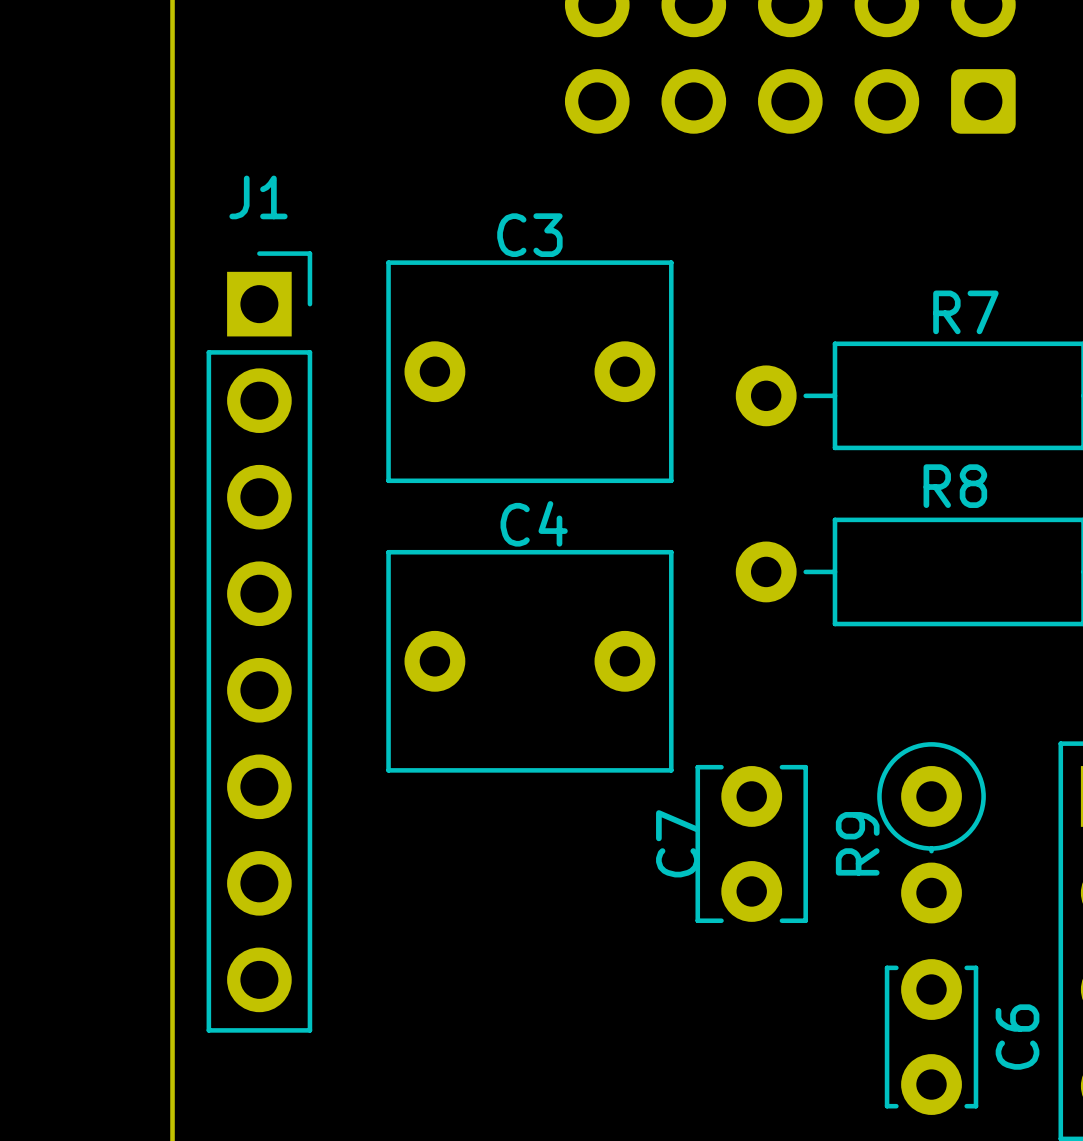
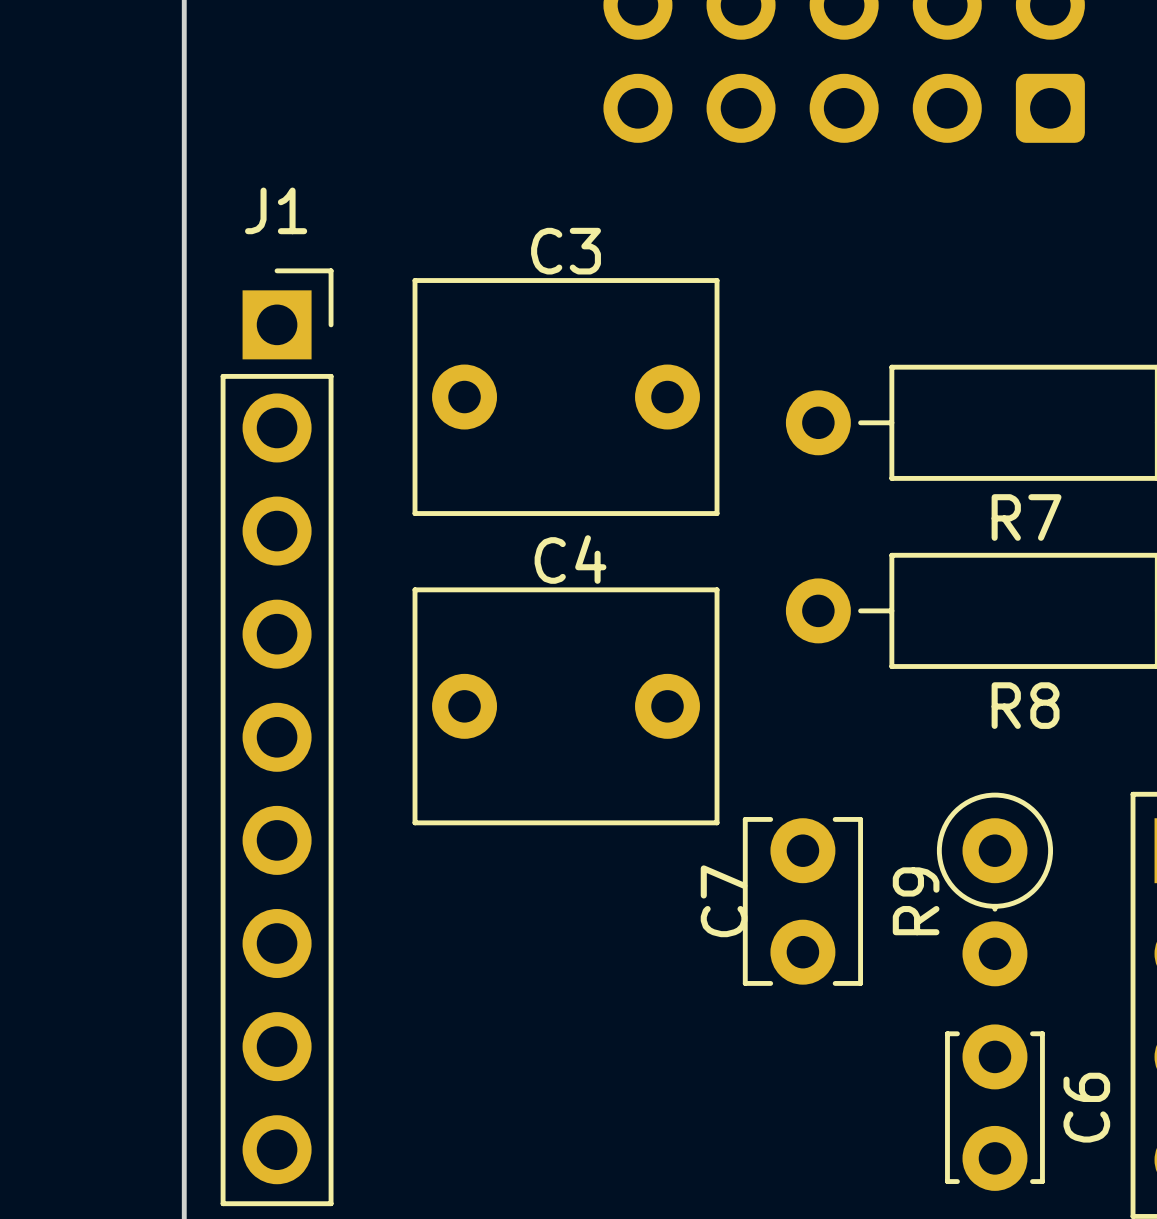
J1 footprint: [206, 251, 313, 1033] -> [220, 268, 334, 1207]
R7 name position: R7 (965, 312) -> R7 (1026, 517)
R8 name position: R8 (955, 486) -> R8 (1025, 705)

